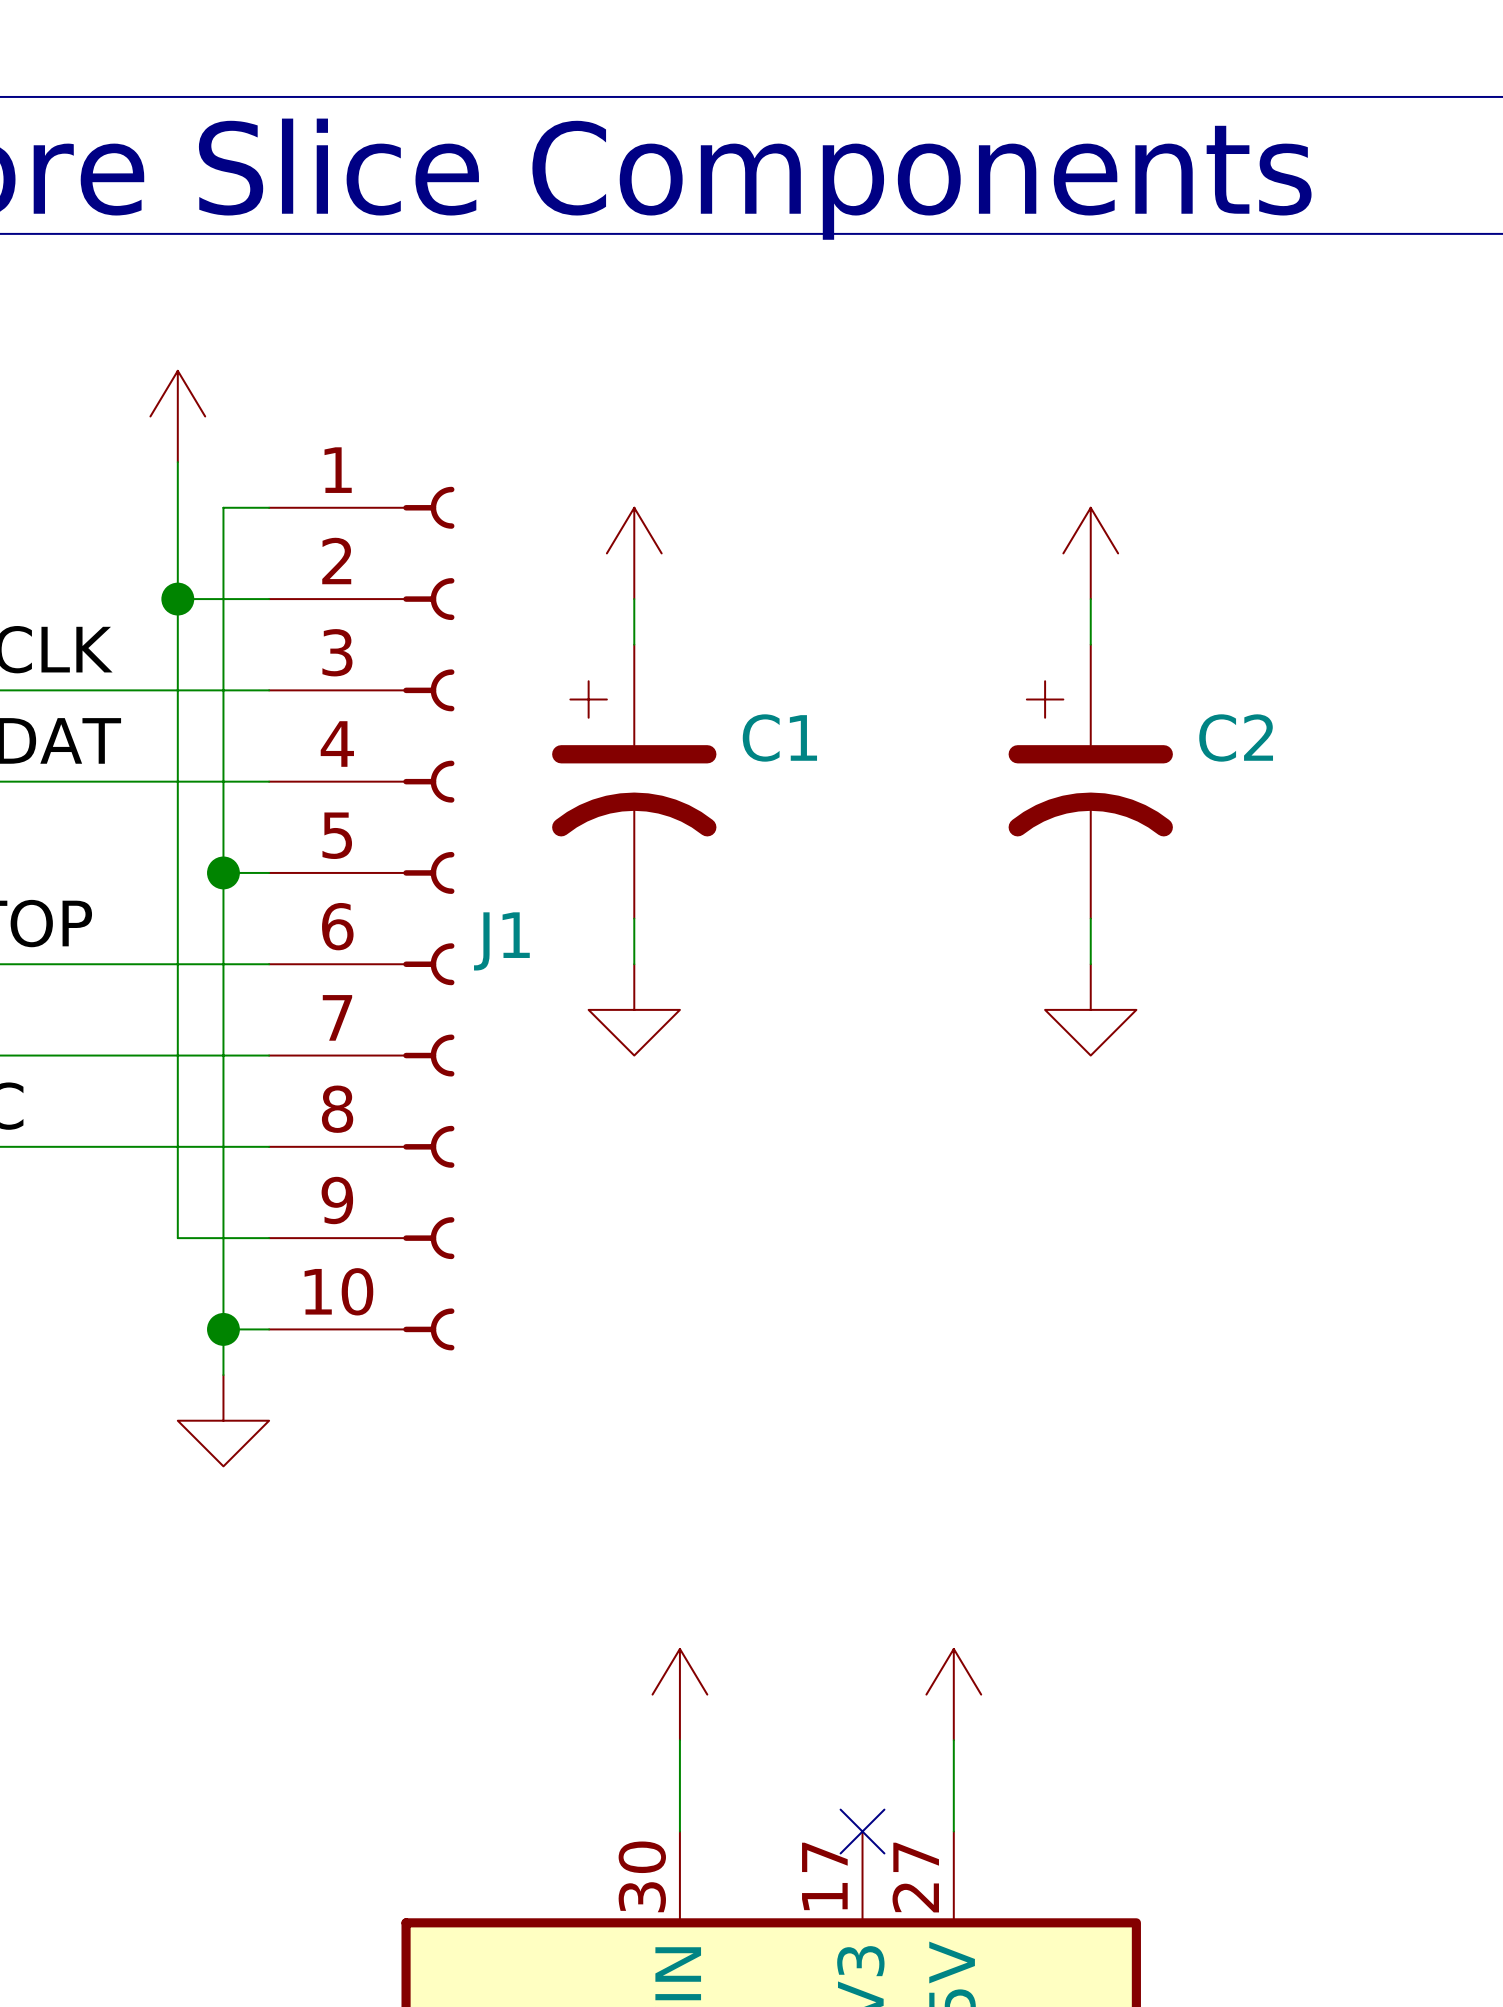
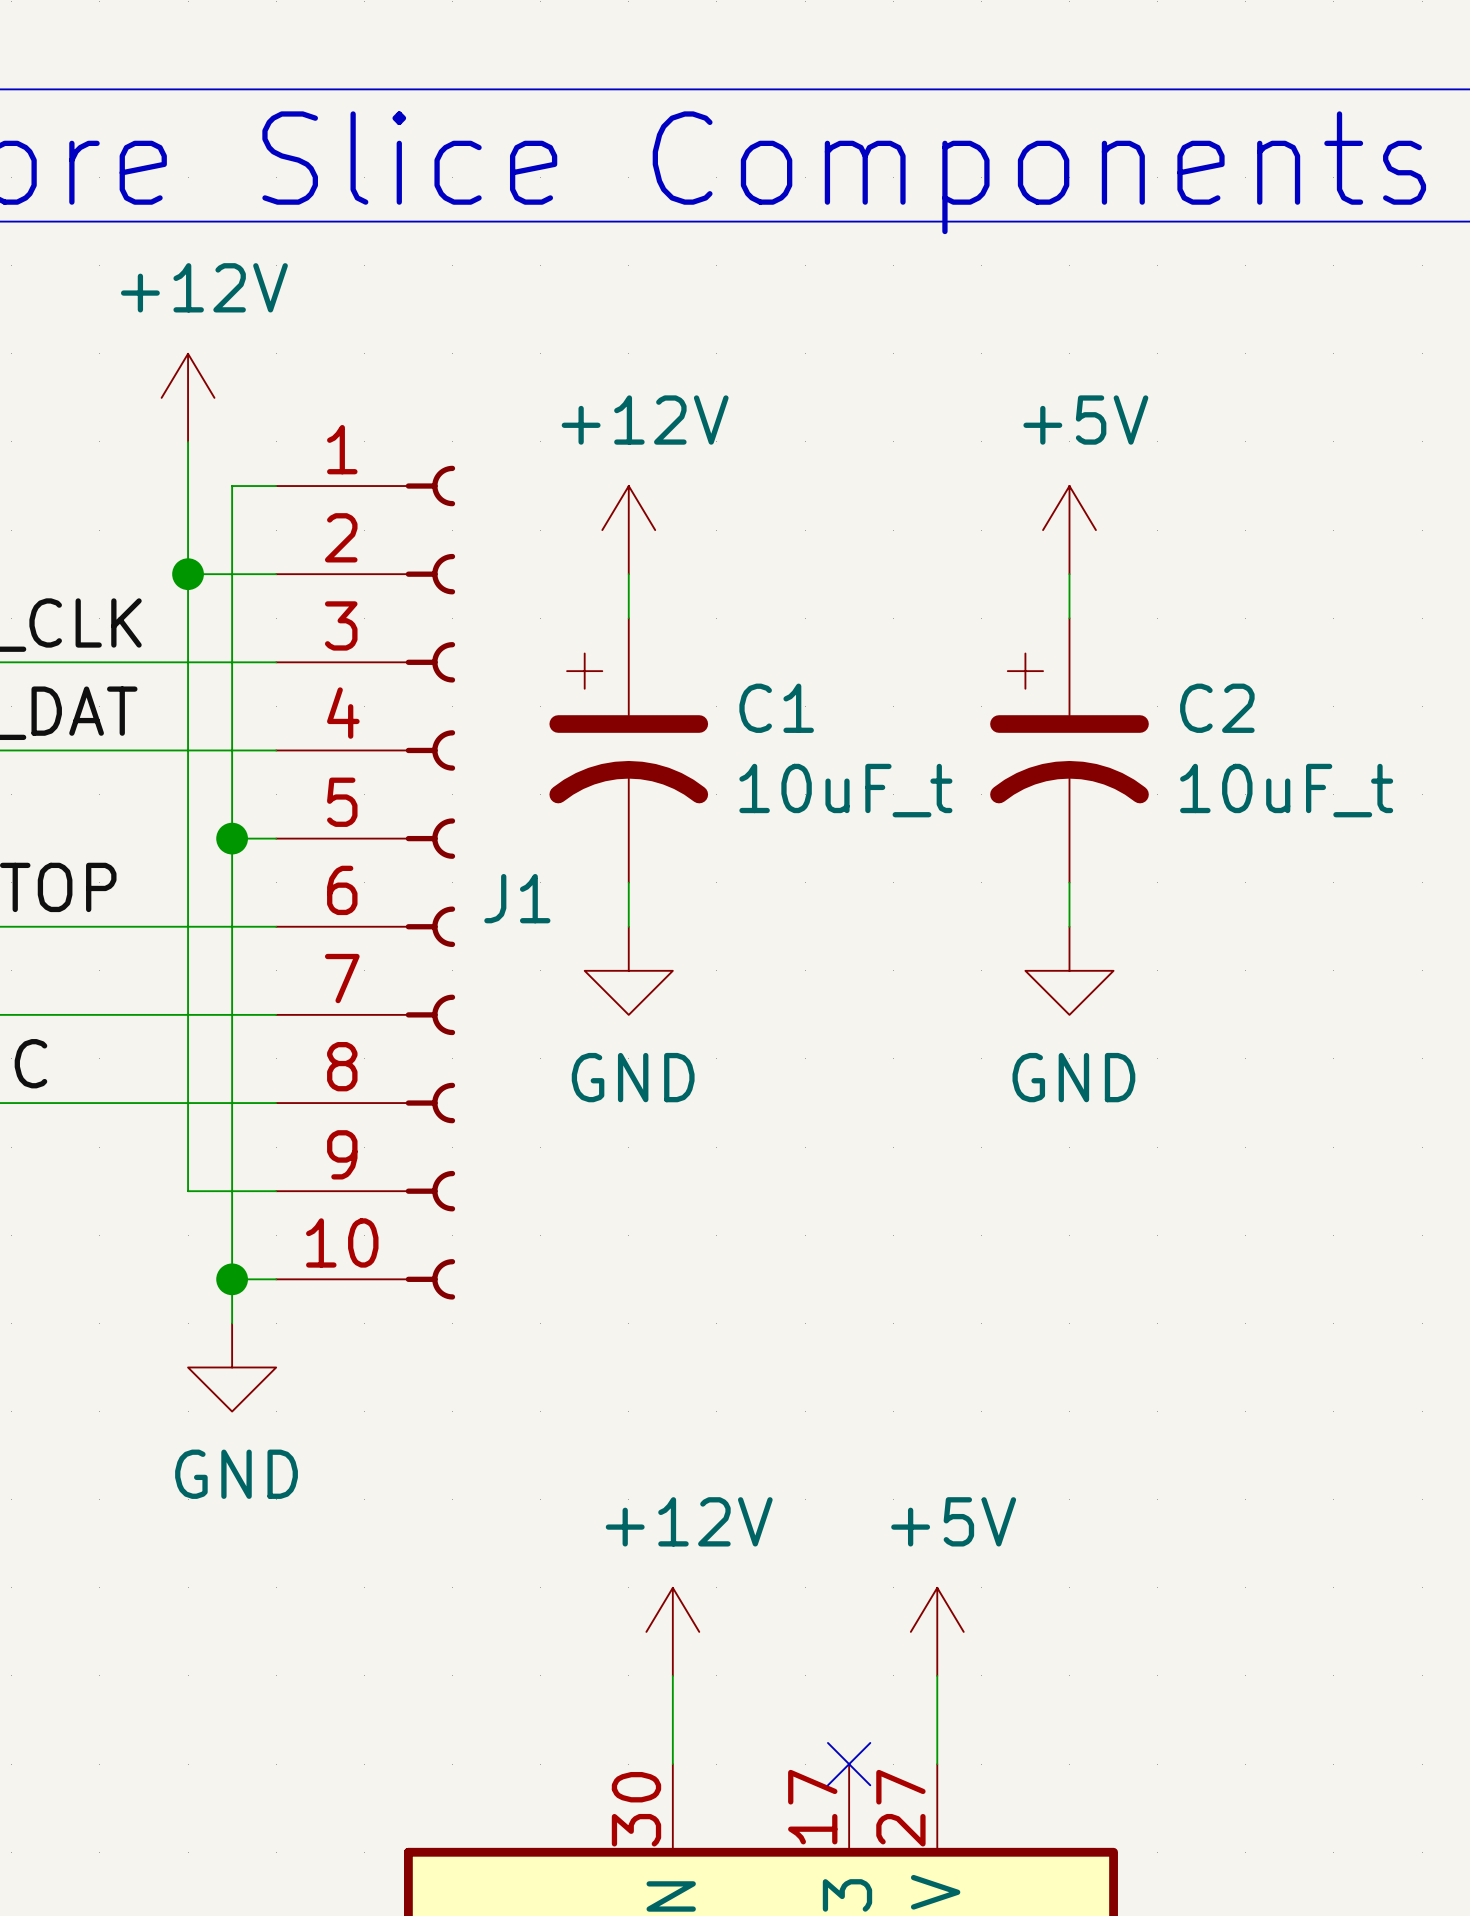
power symbol text: none -> +12V (204, 287)
power symbol text: none -> +12V (645, 420)
power symbol text: none -> +5V (1085, 420)
C1 value: none -> 10uF_t (845, 790)
C2 value: none -> 10uF_t (1286, 790)
power symbol text: none -> GND (633, 1077)
power symbol text: none -> GND (1073, 1077)
power symbol text: none -> GND (236, 1474)
power symbol text: none -> +12V (689, 1521)
power symbol text: none -> +5V (953, 1521)

